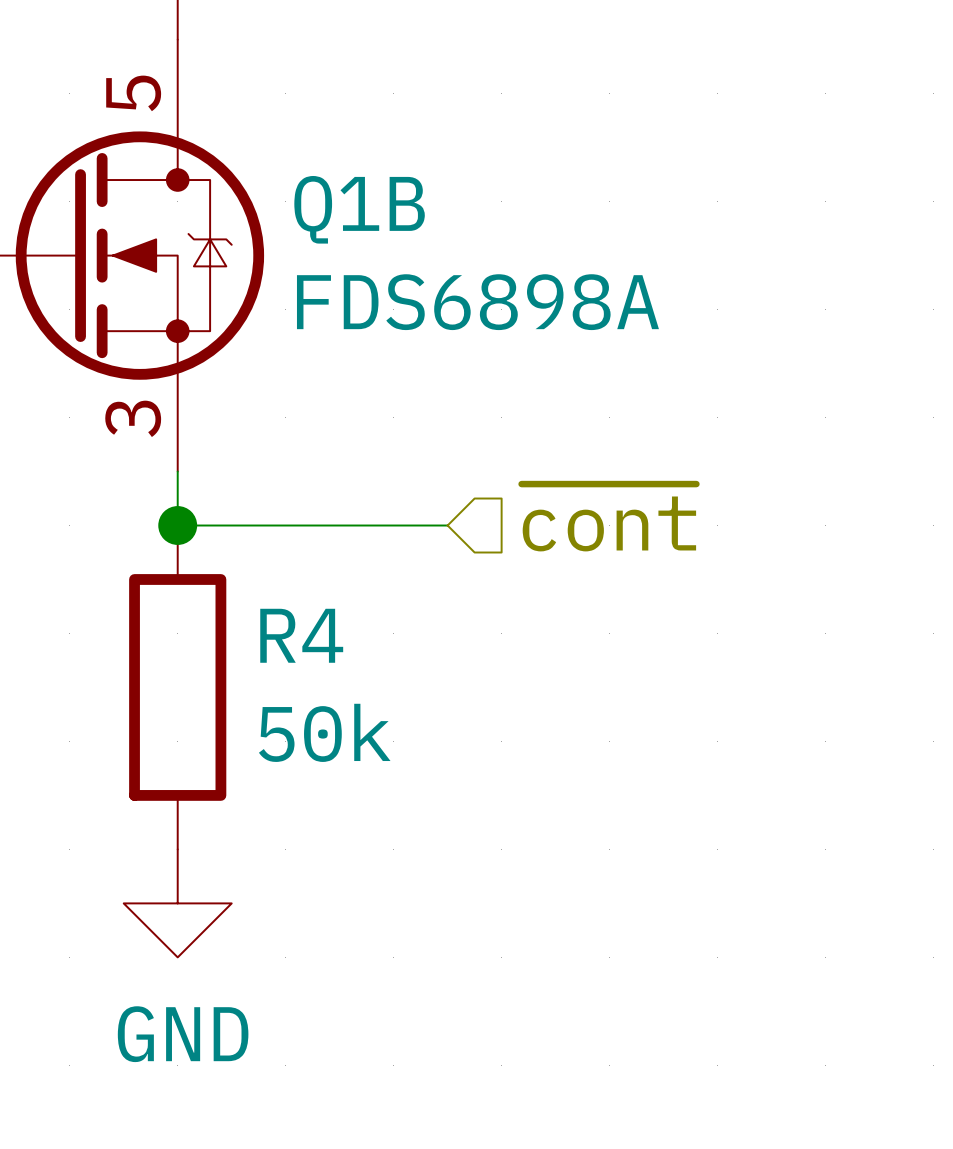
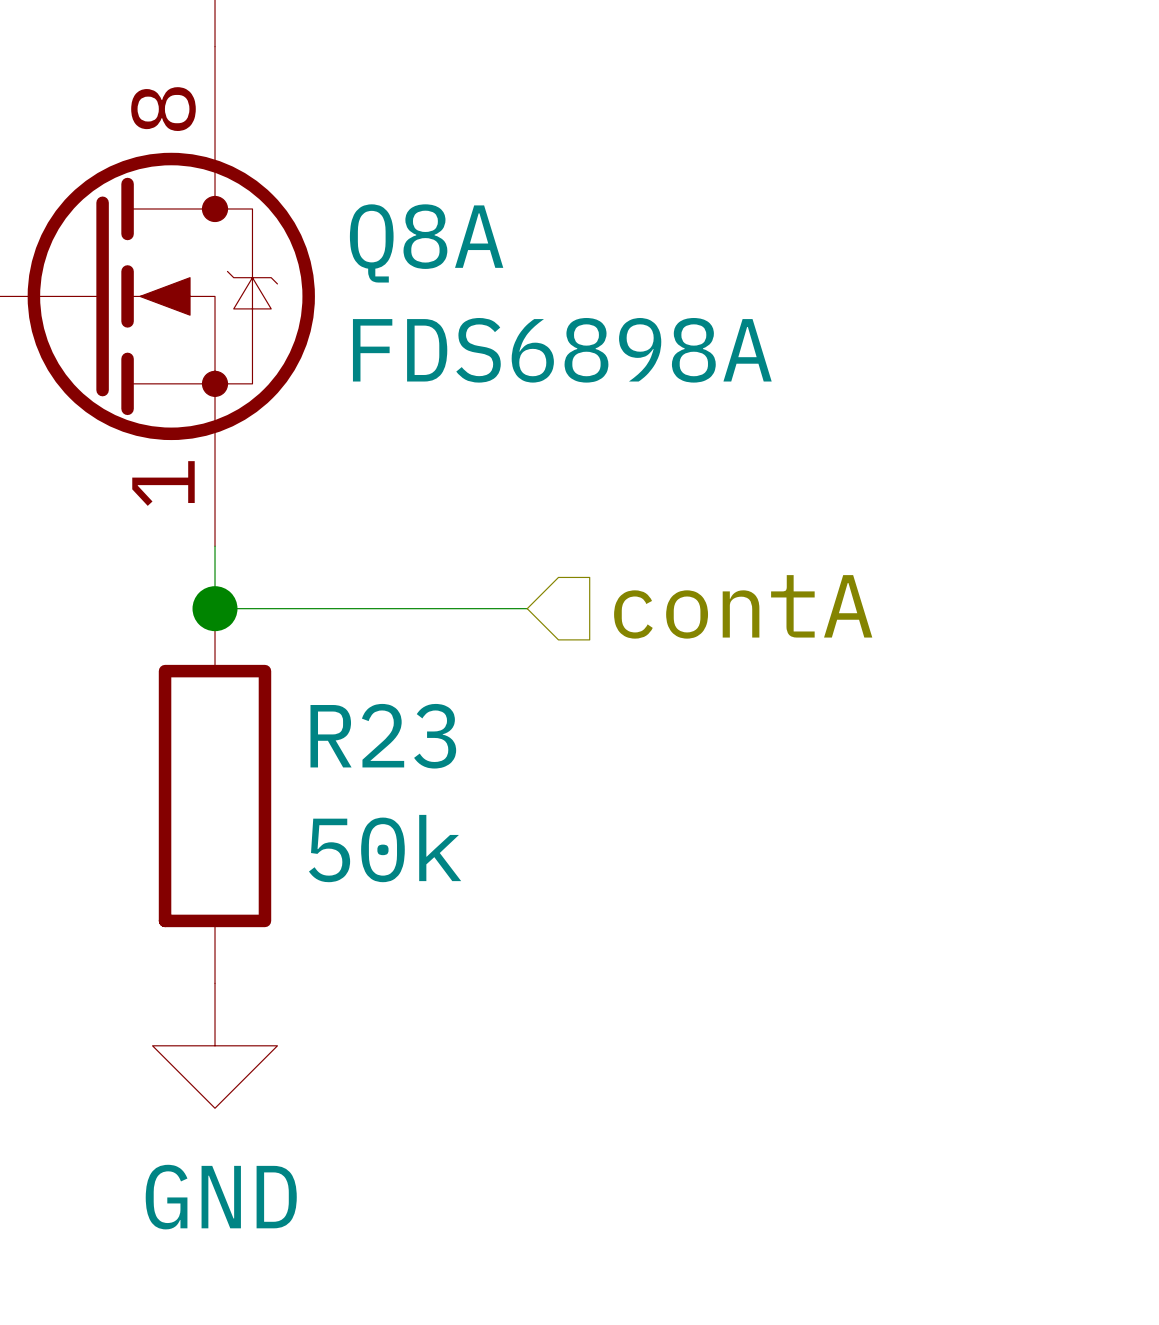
Q1B pin number: 5 (133, 93) -> 8 (163, 109)
Q1B name: Q1B (359, 209) -> Q8A (426, 243)
Q1B pin number: 3 (133, 418) -> 1 (163, 483)
hierarchical label: ~{cont} (609, 517) -> contA (743, 606)
R4 name: R4 (301, 635) -> R23 (383, 736)

